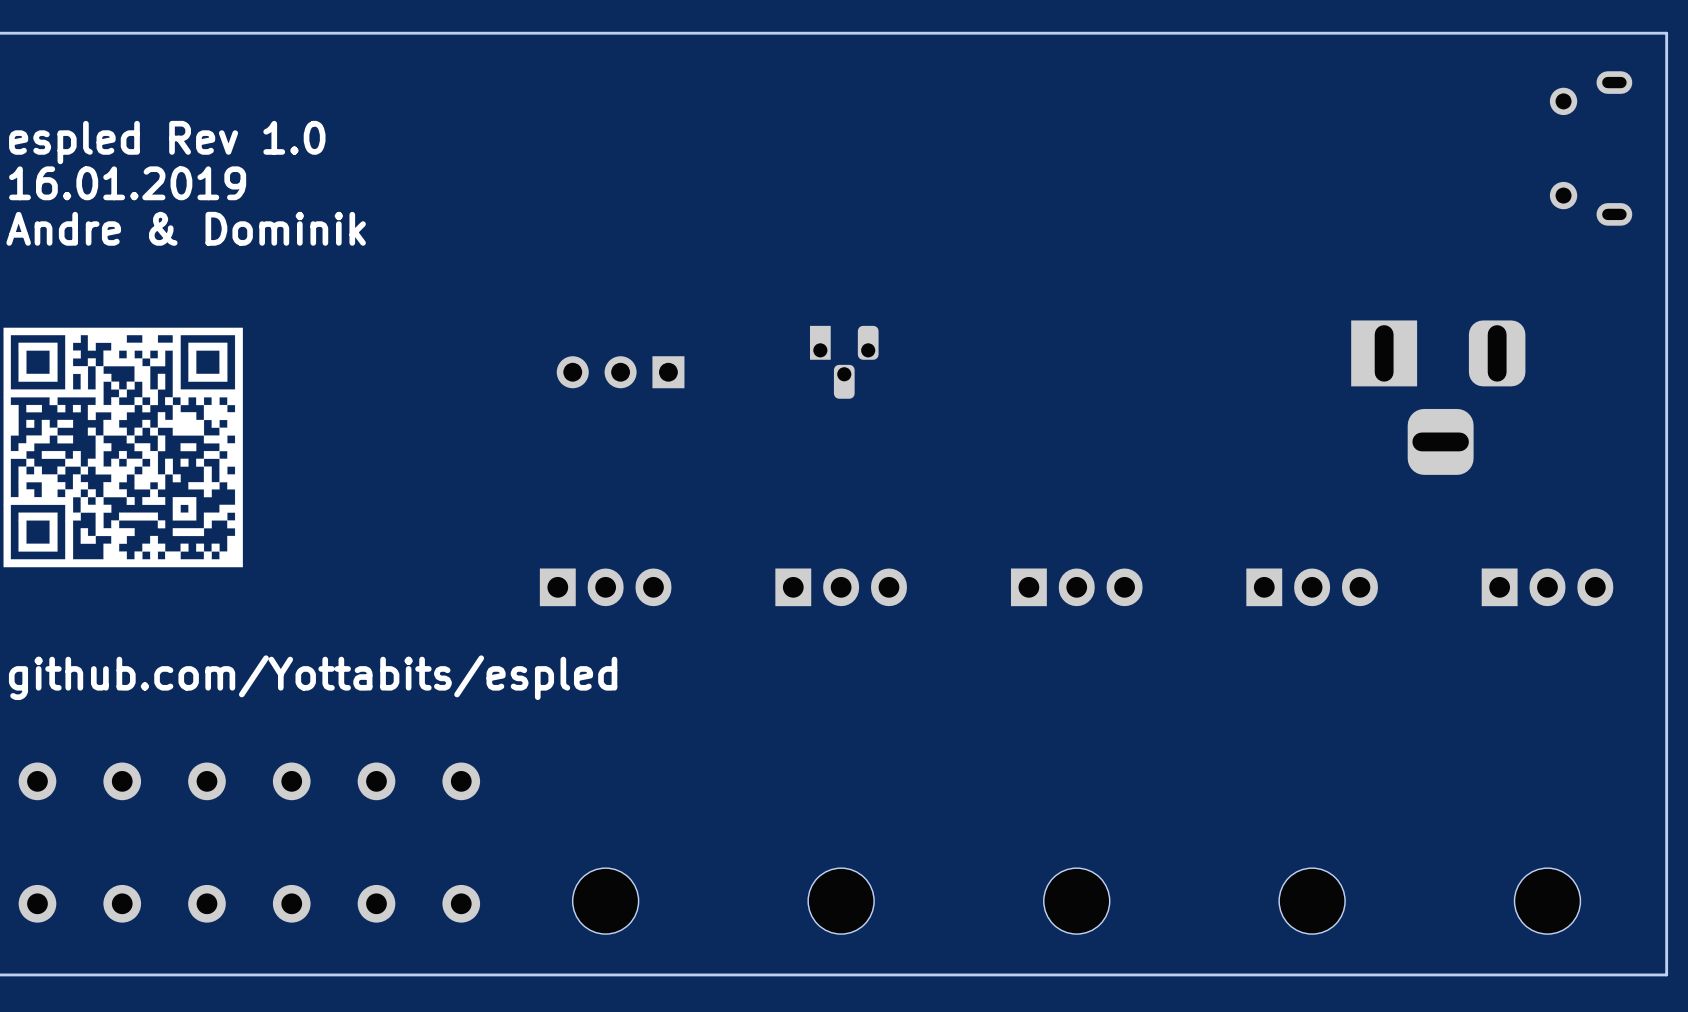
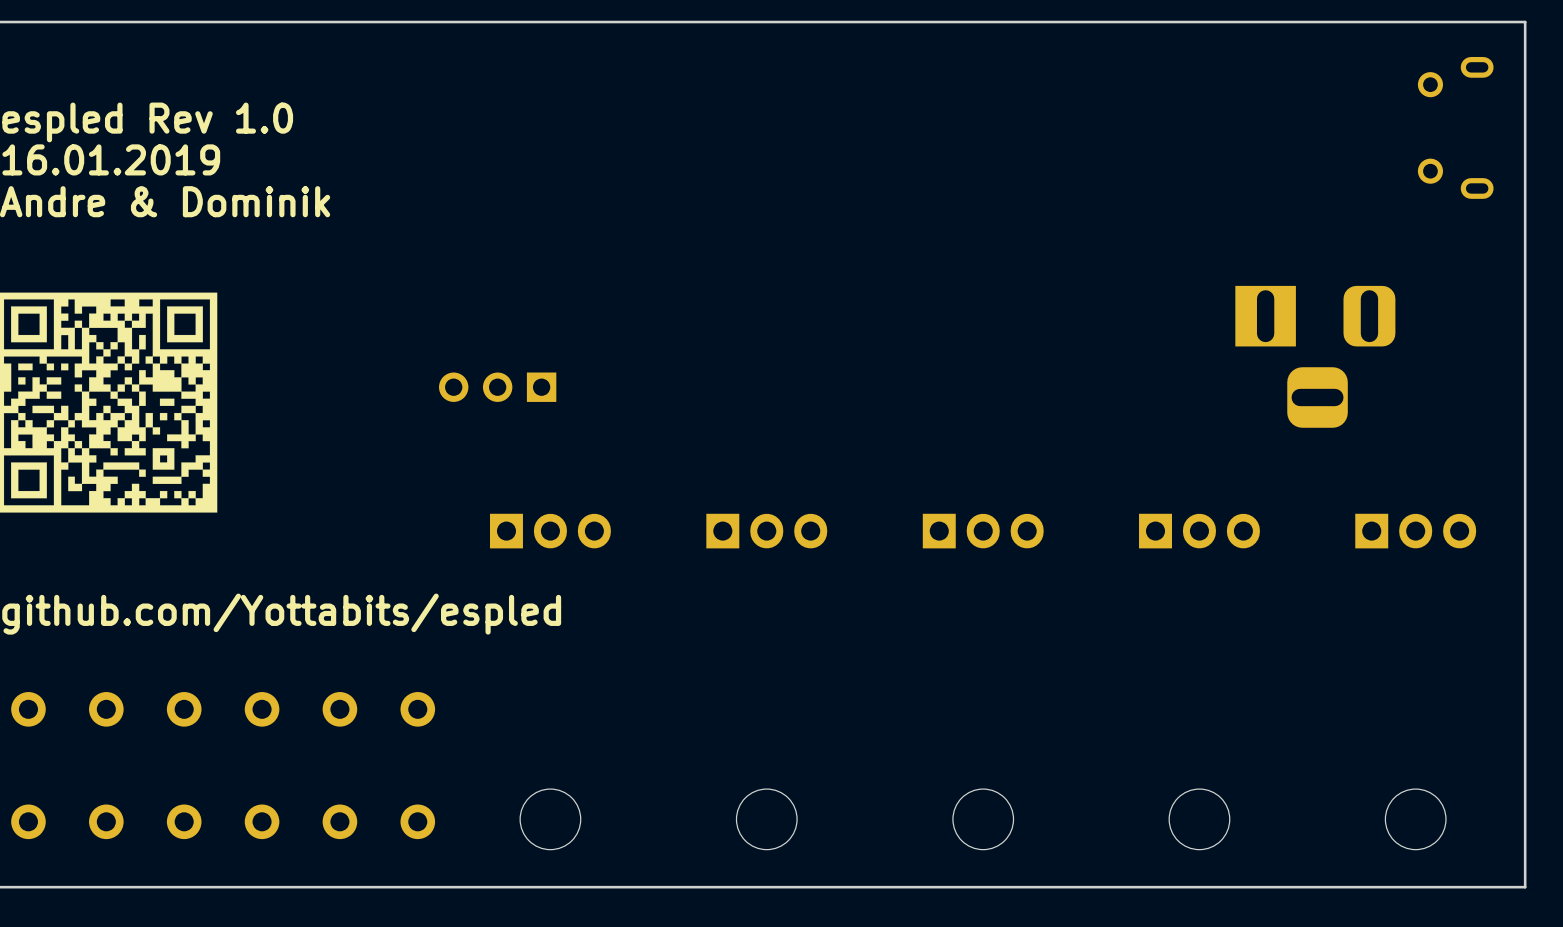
part: (844, 362) -> none
part position: (620, 372) -> (497, 387)

